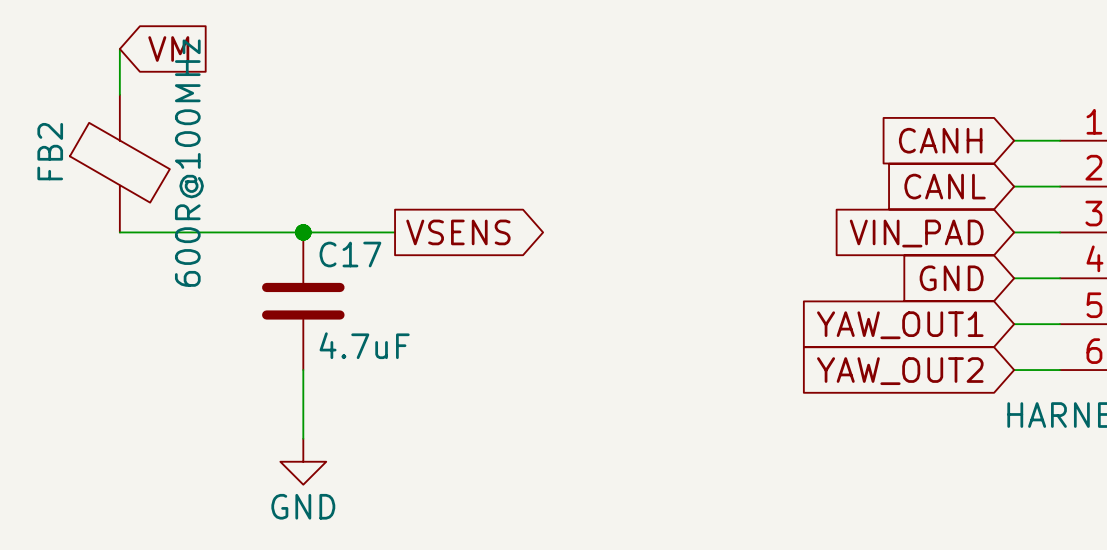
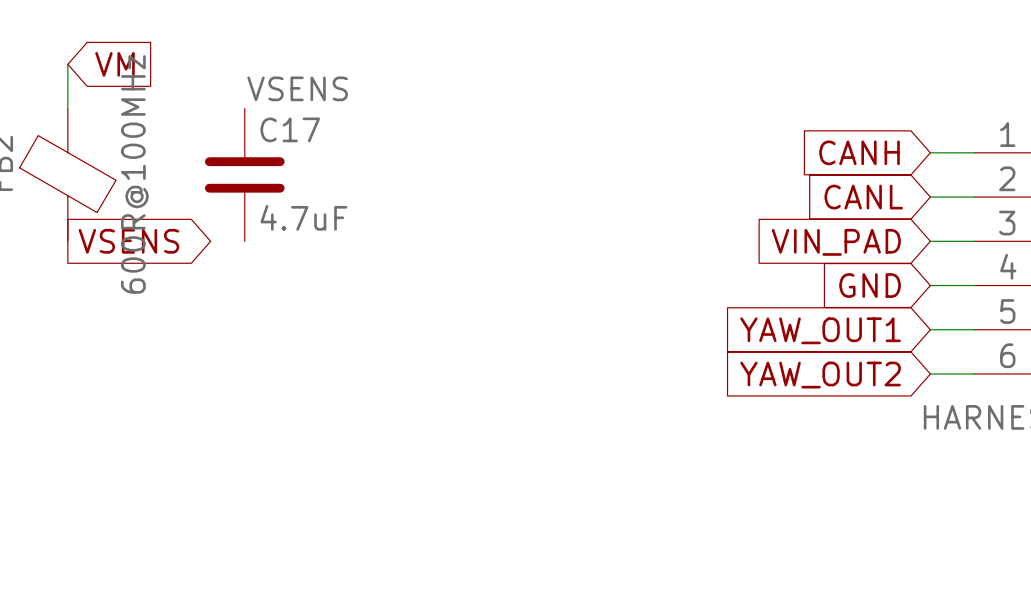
label: none -> VSENS (297, 88)
wire: (119, 232) (395, 232) -> none
junction: (303, 232) -> none
global label position: VSENS (458, 232) -> VSENS (128, 241)
C17 position: (303, 301) -> (244, 174)
wire: (303, 370) (303, 438) -> none
power symbol: GND (303, 461) -> none

